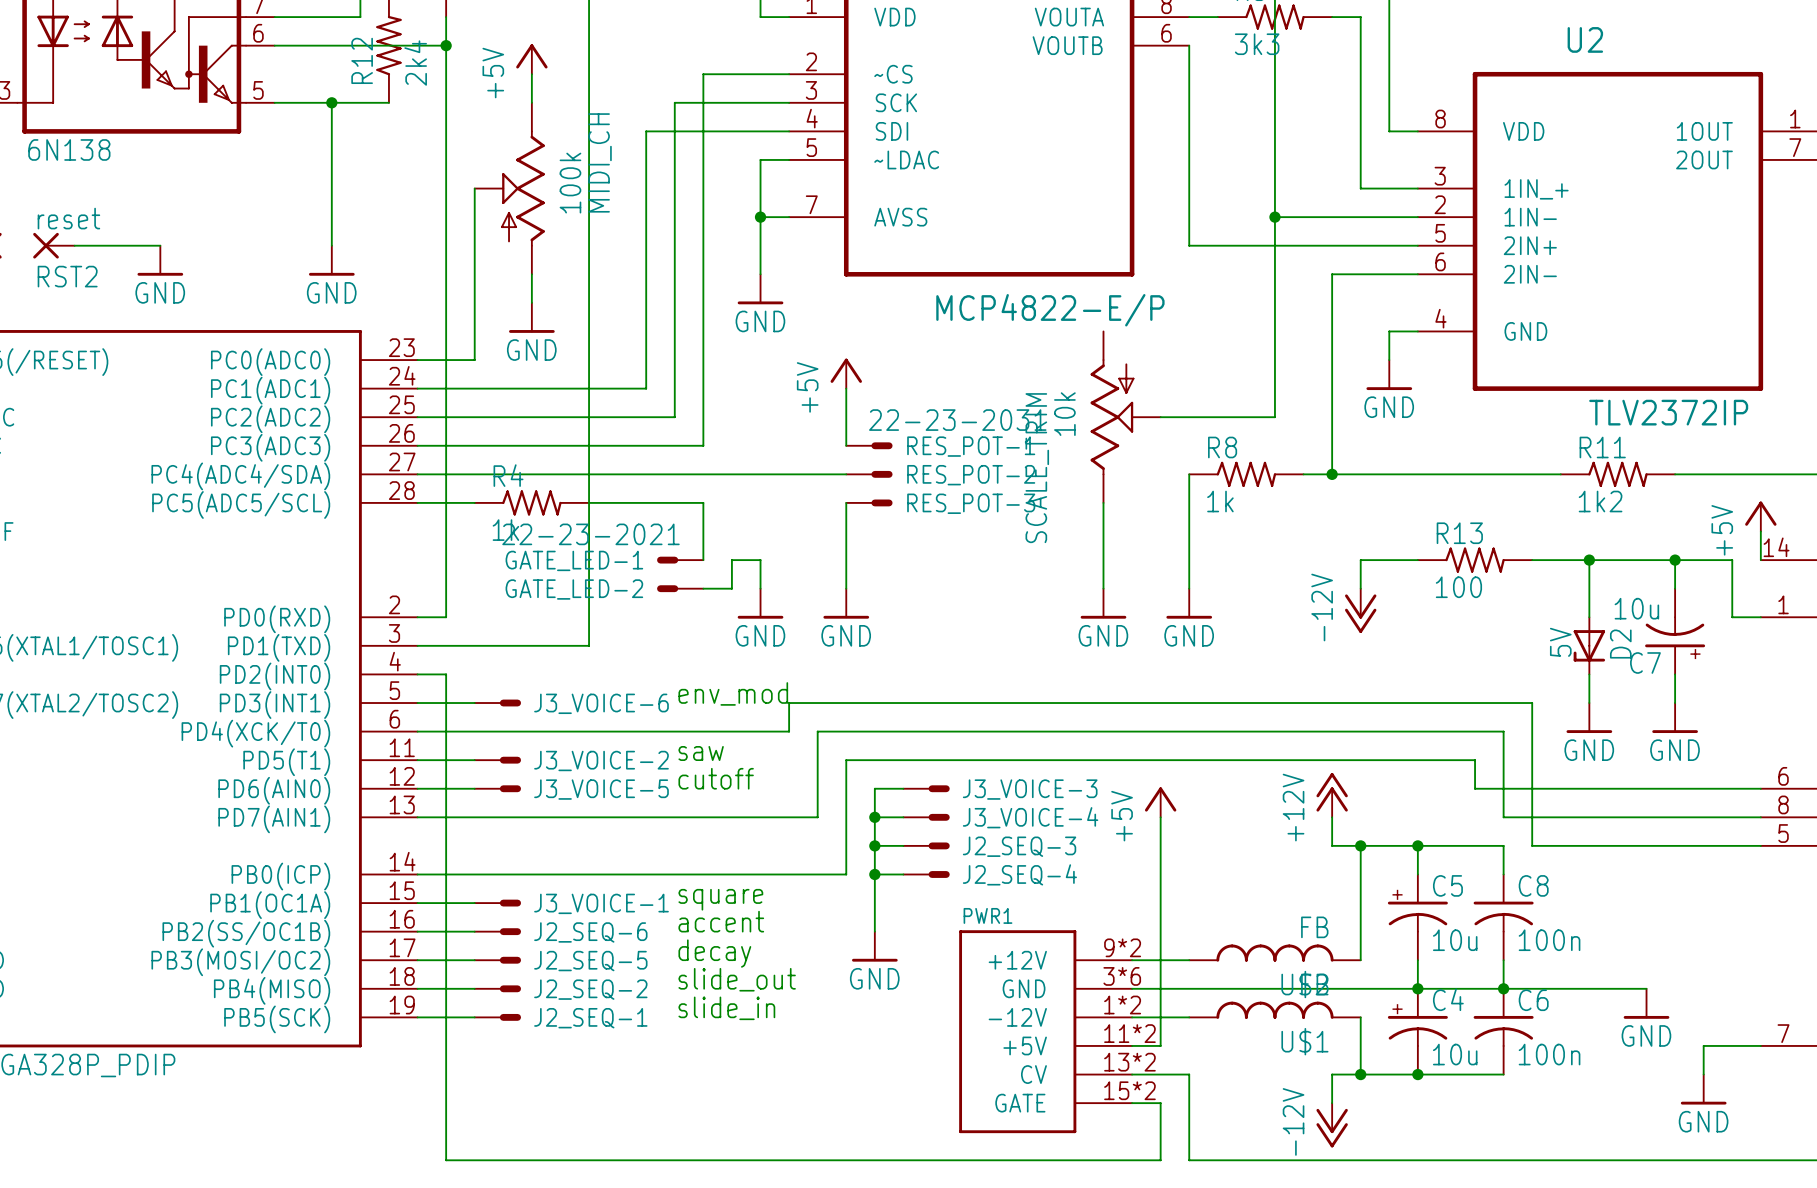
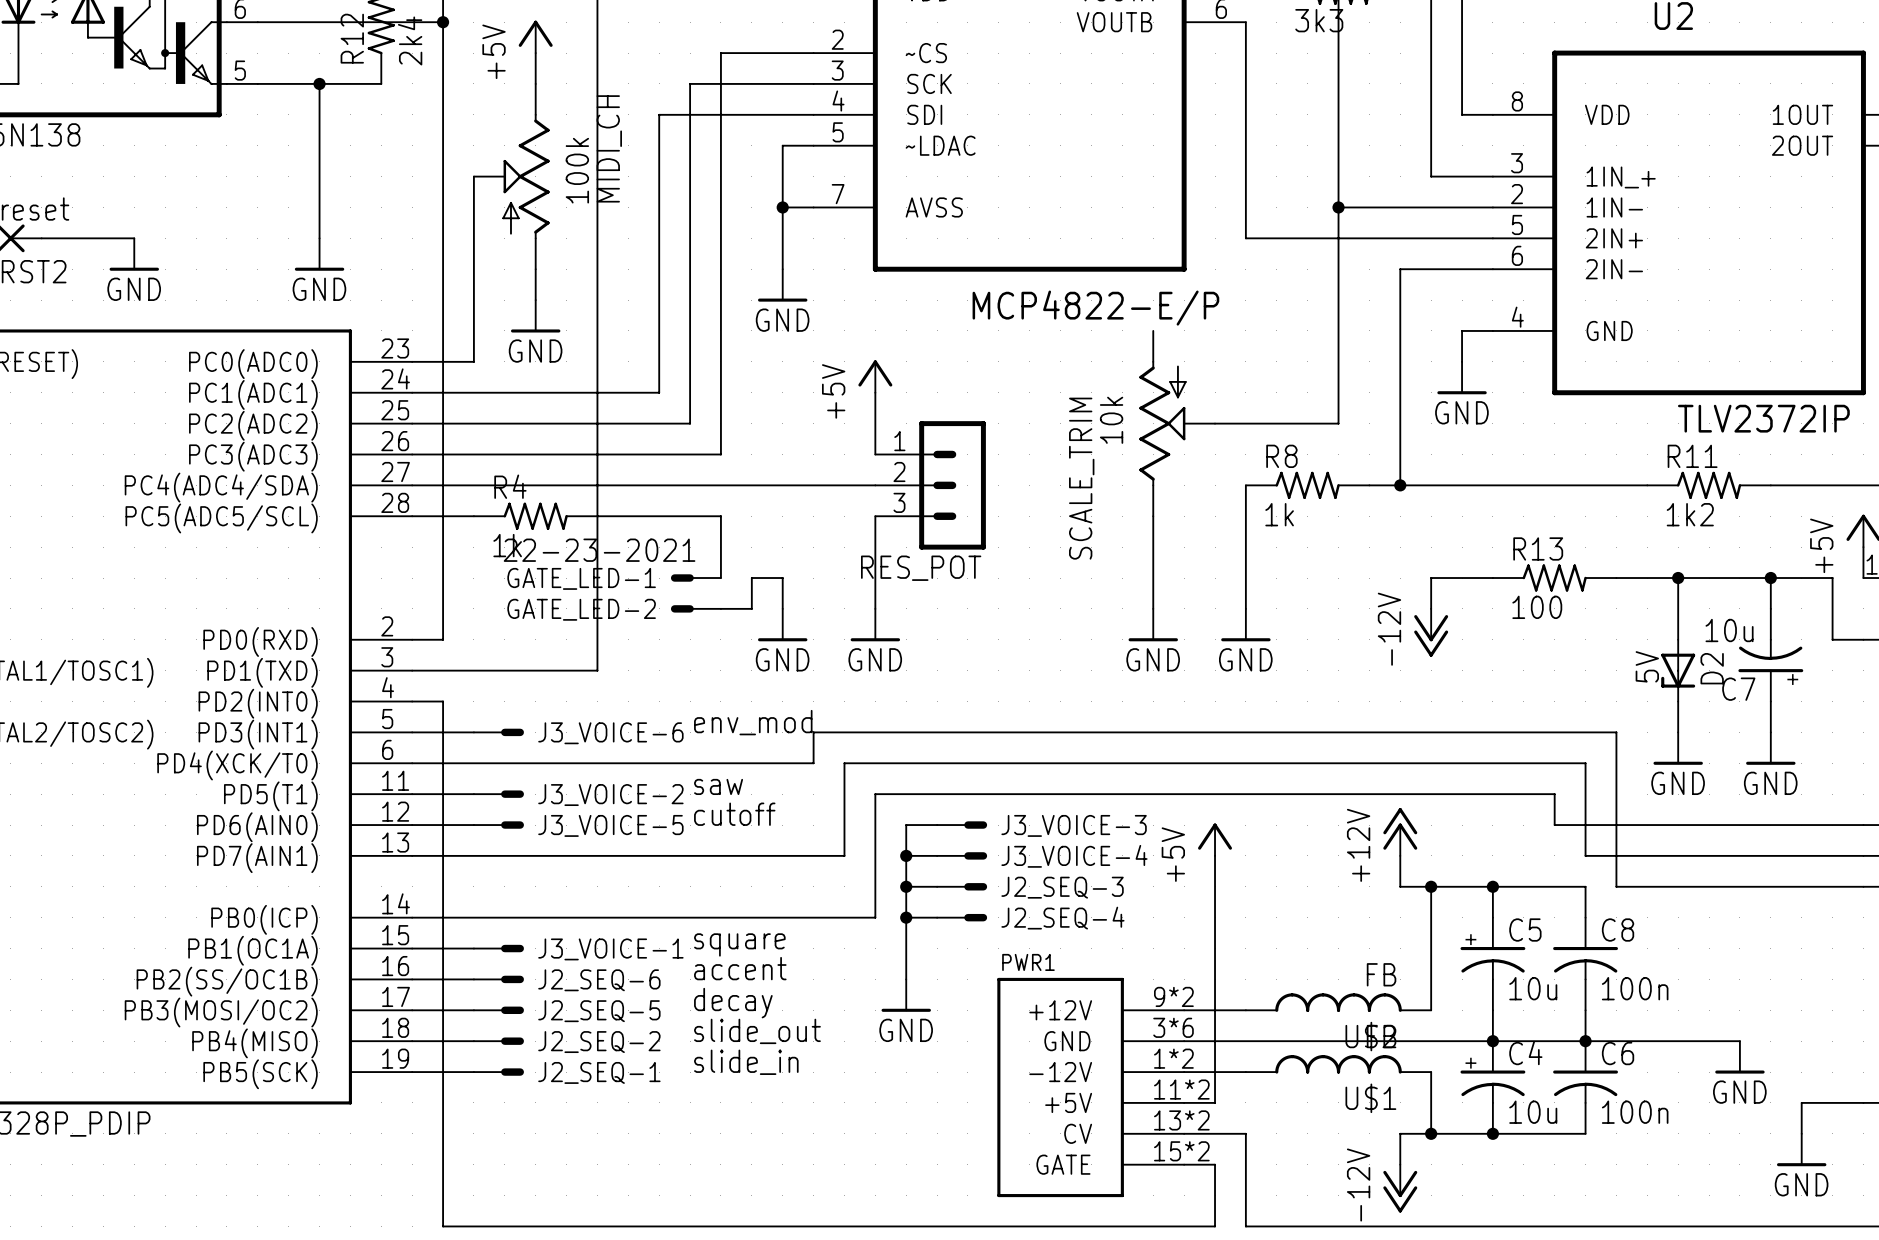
RES_POT-1: 22-23-2031 (869, 445) -> none
RES_POT-2: (869, 474) -> none
RES_POT: none -> (930, 485)
RES_POT-3: (869, 502) -> none

